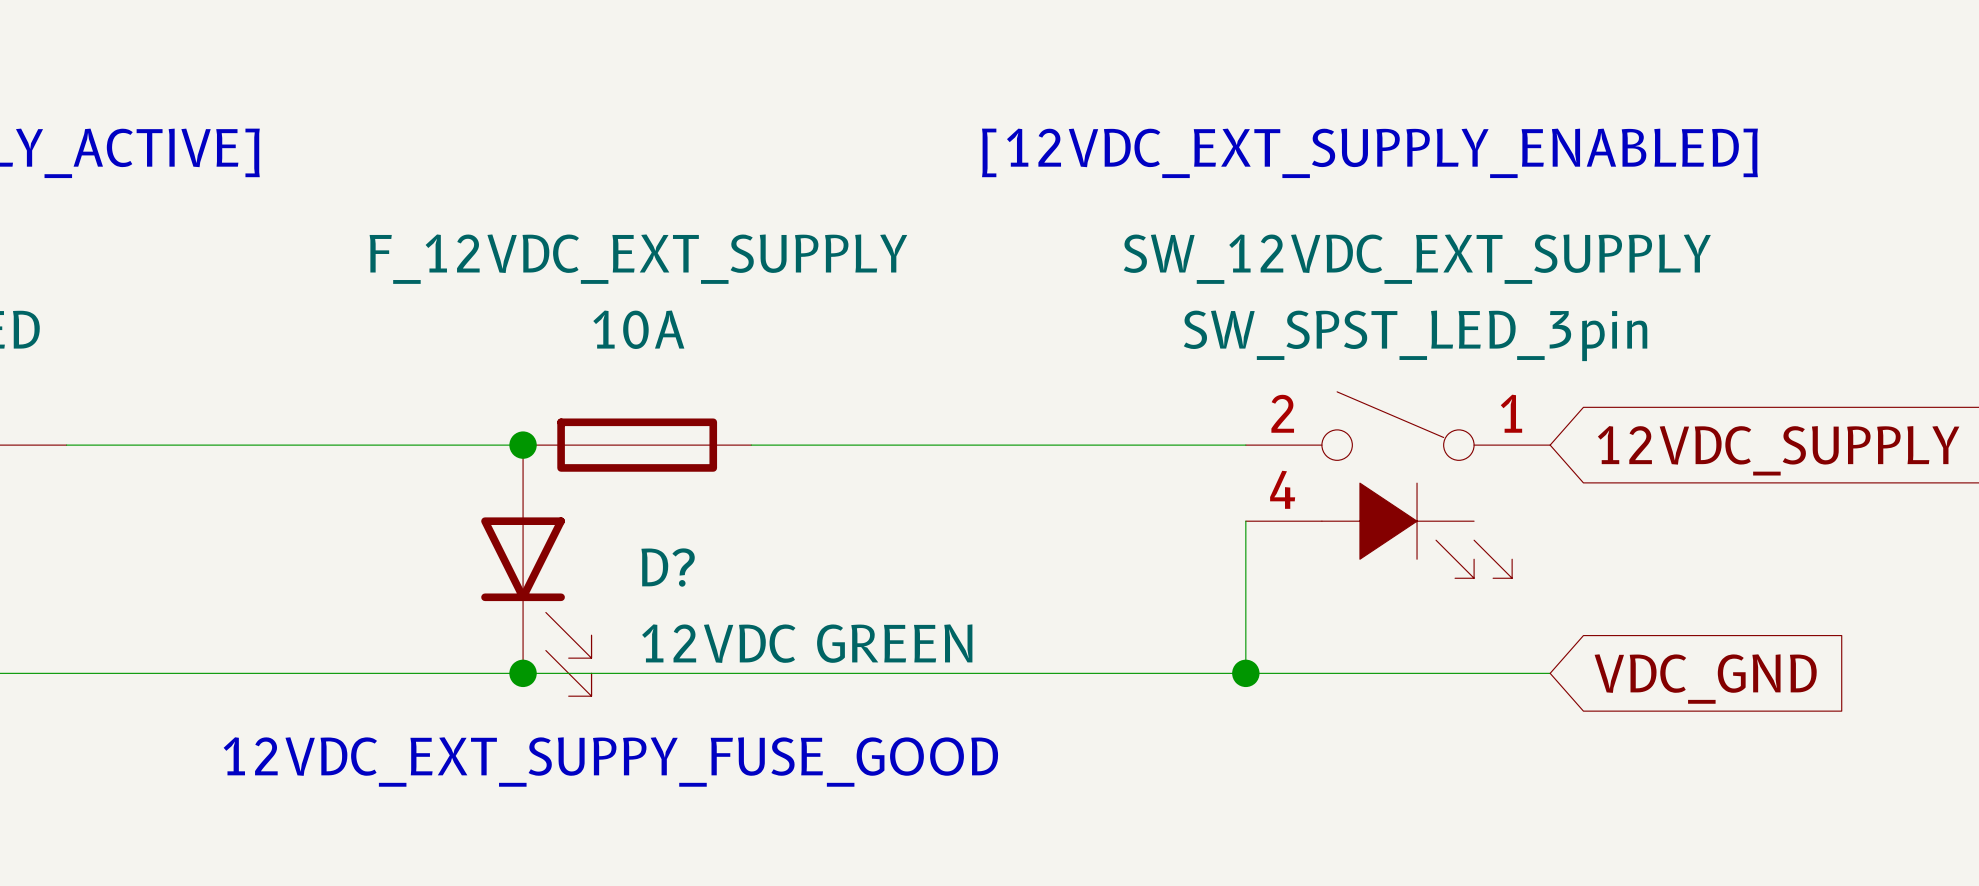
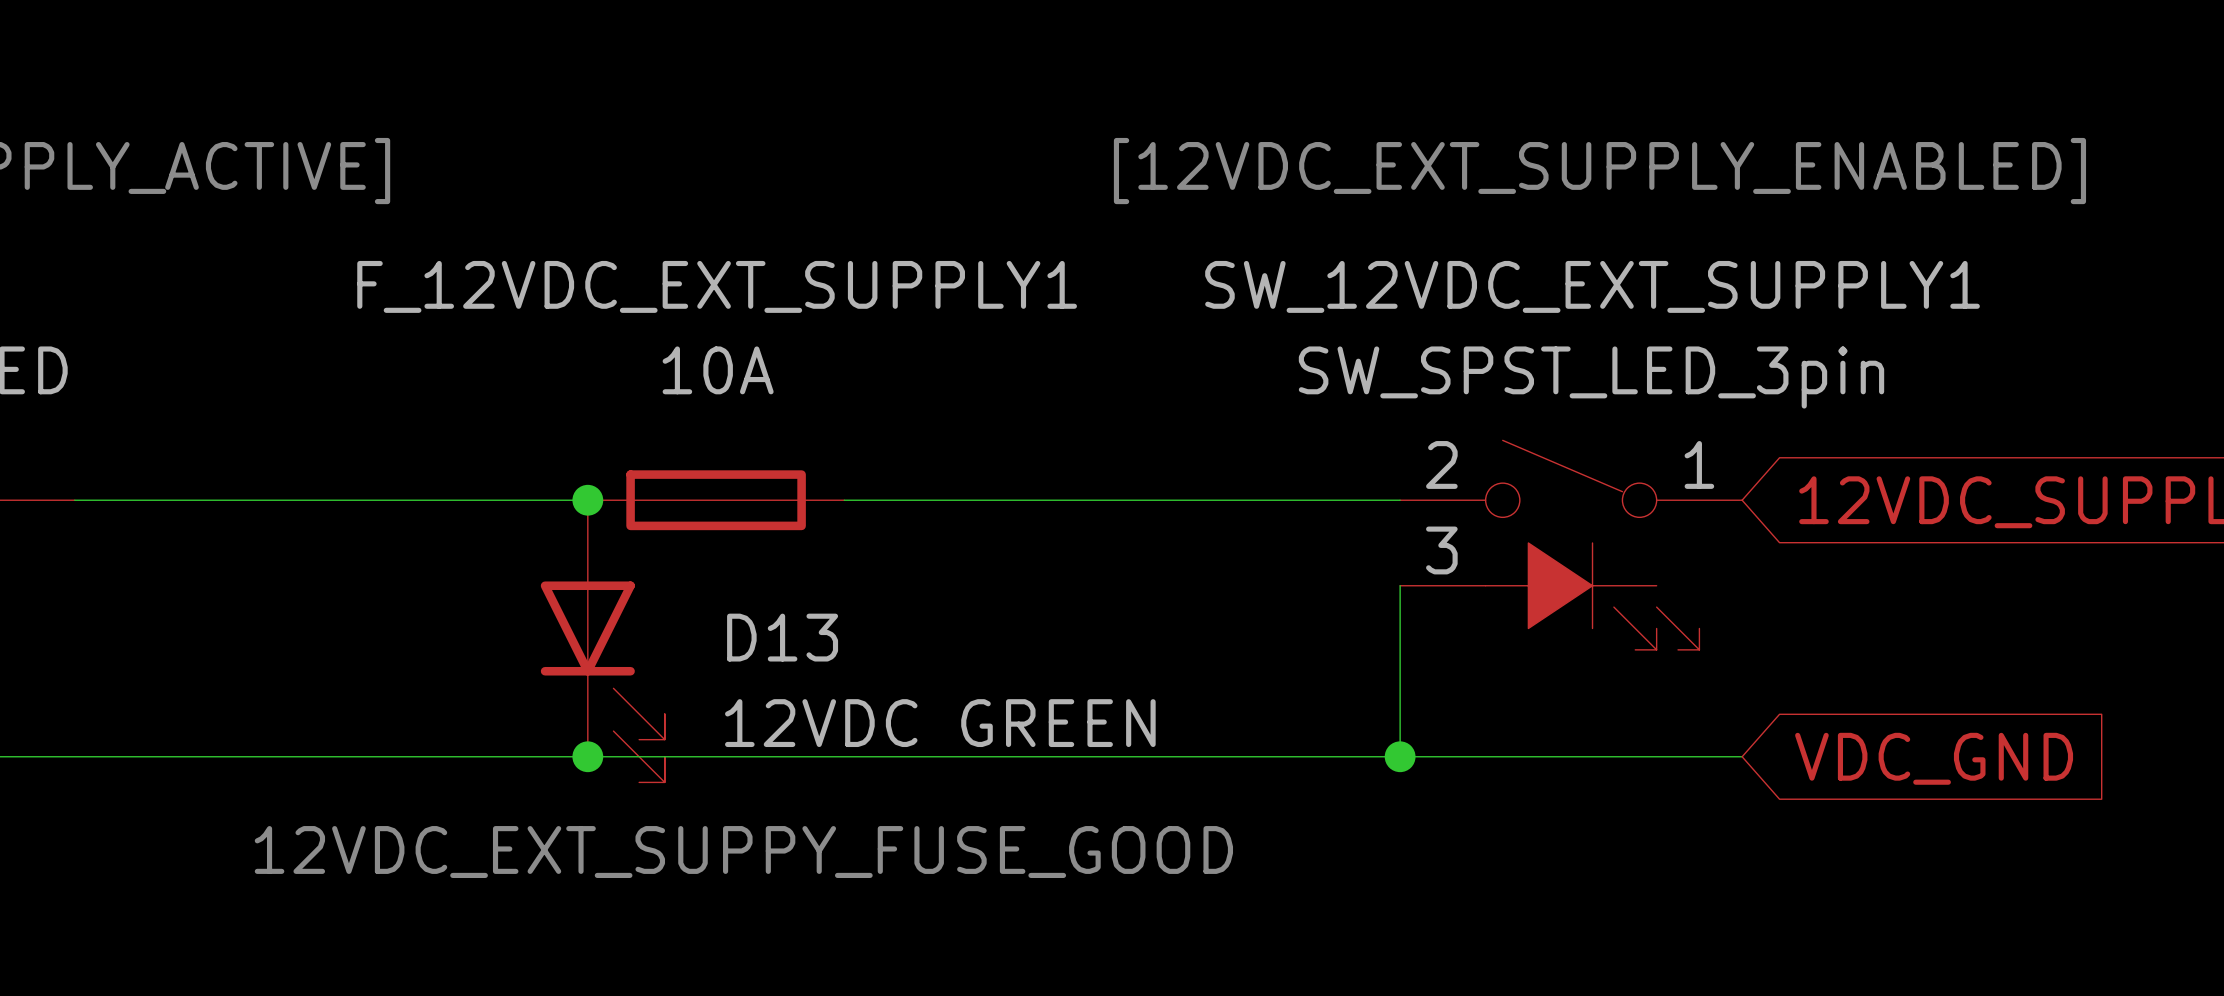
F_12VDC_EXT_SUPPLY name: F_12VDC_EXT_SUPPLY (638, 259) -> F_12VDC_EXT_SUPPLY1 (717, 286)
SW_12VDC_EXT_SUPPLY name: SW_12VDC_EXT_SUPPLY (1417, 259) -> SW_12VDC_EXT_SUPPLY1 (1592, 286)
SW_12VDC_EXT_SUPPLY pin number: 4 (1282, 489) -> 3 (1441, 550)
D? name: D? (668, 567) -> D13 (782, 637)

